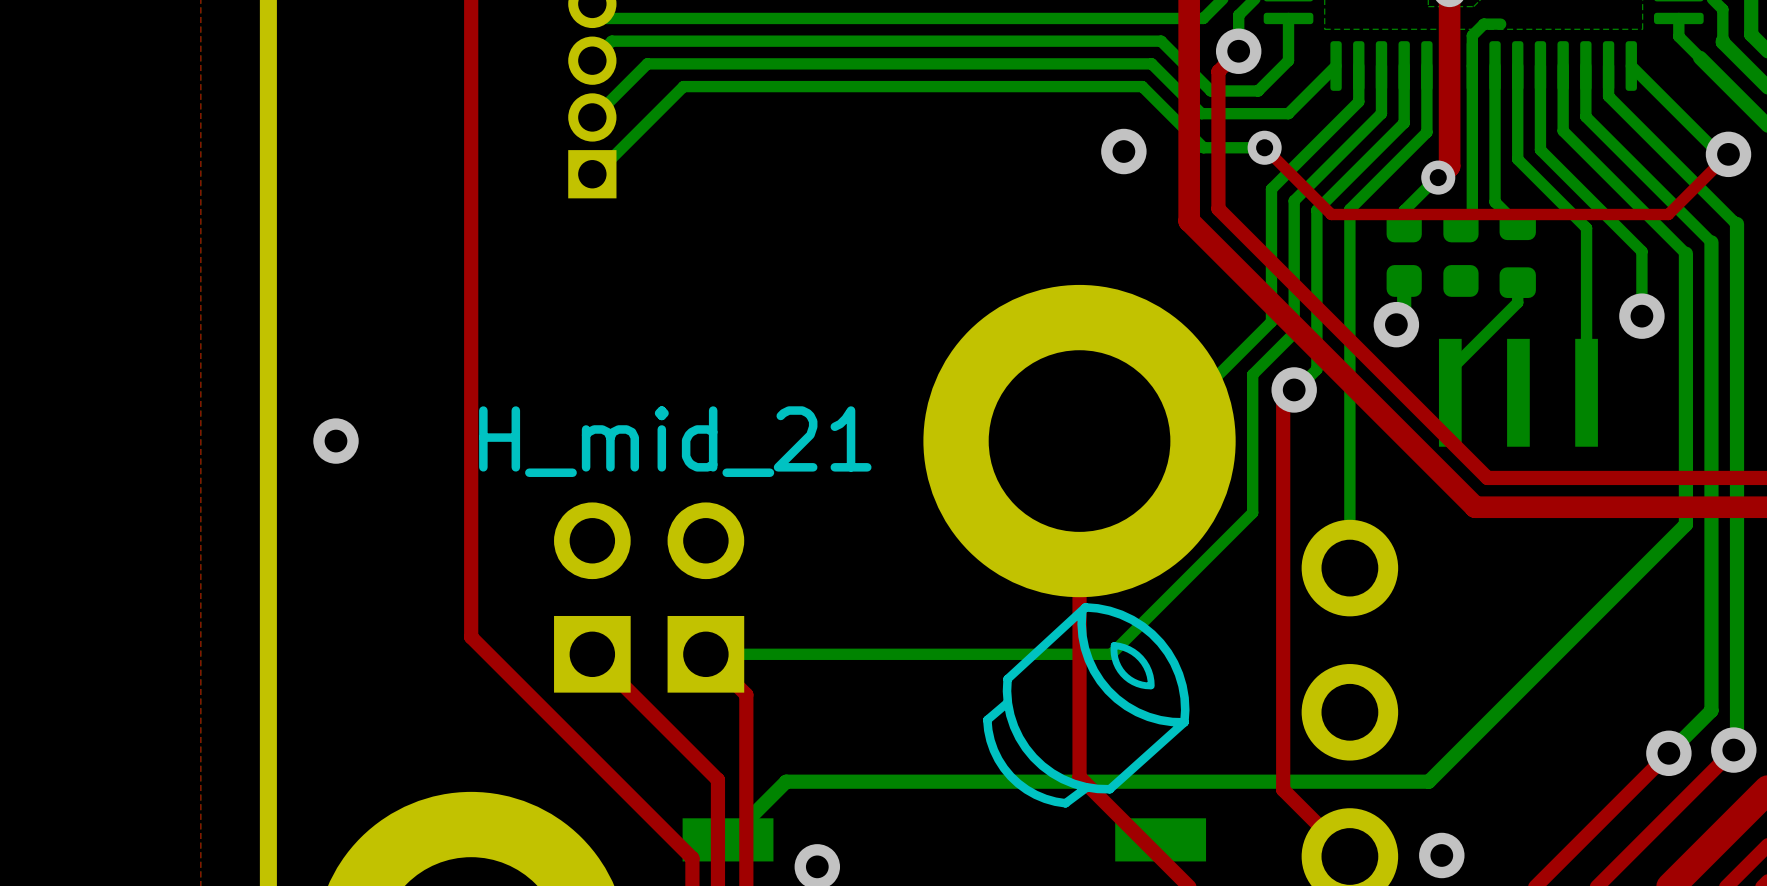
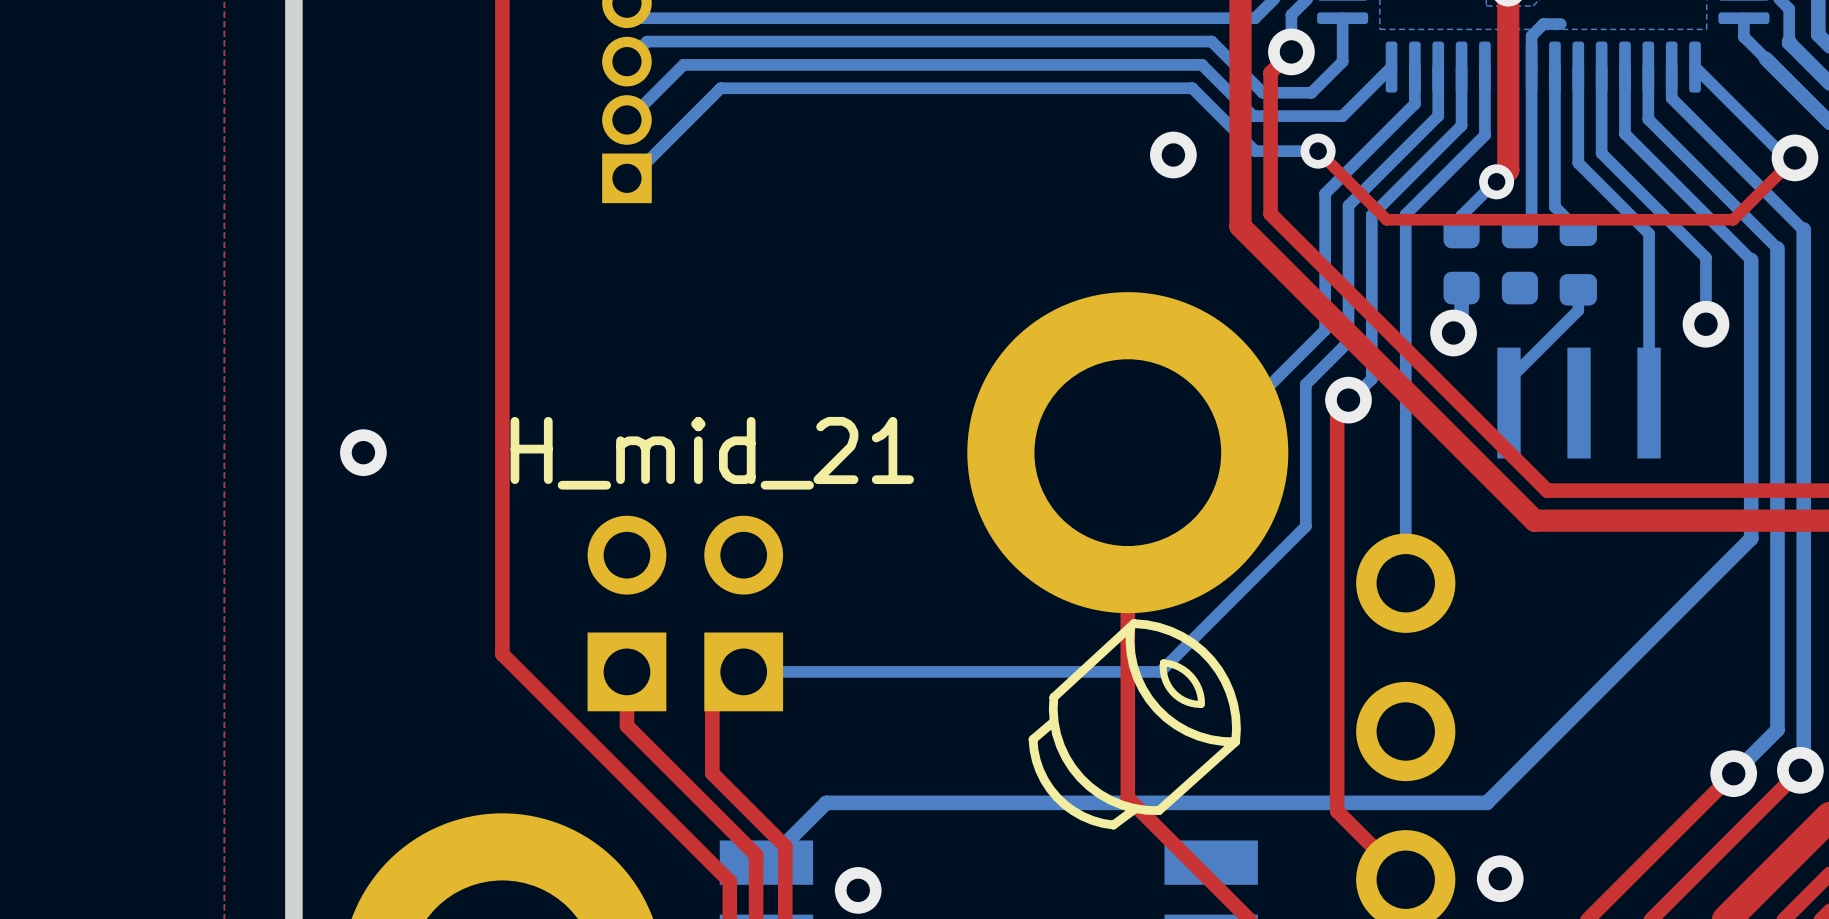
top track: (592, 654) (717, 779) (717, 832) -> (626, 671) (626, 725) (756, 855)
top track: (705, 654) (746, 694) (746, 824) -> (743, 671) (712, 703) (712, 773) (785, 846)

